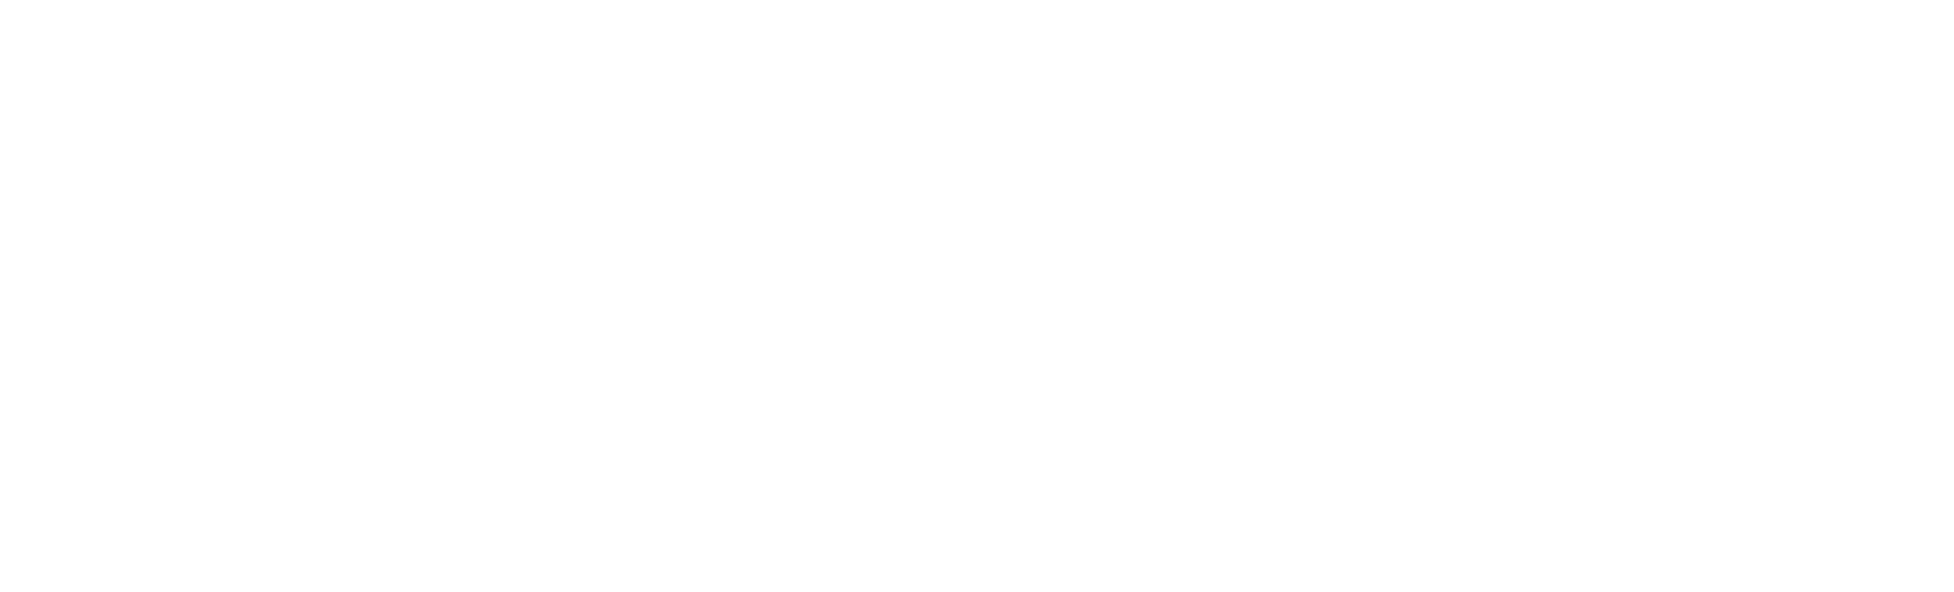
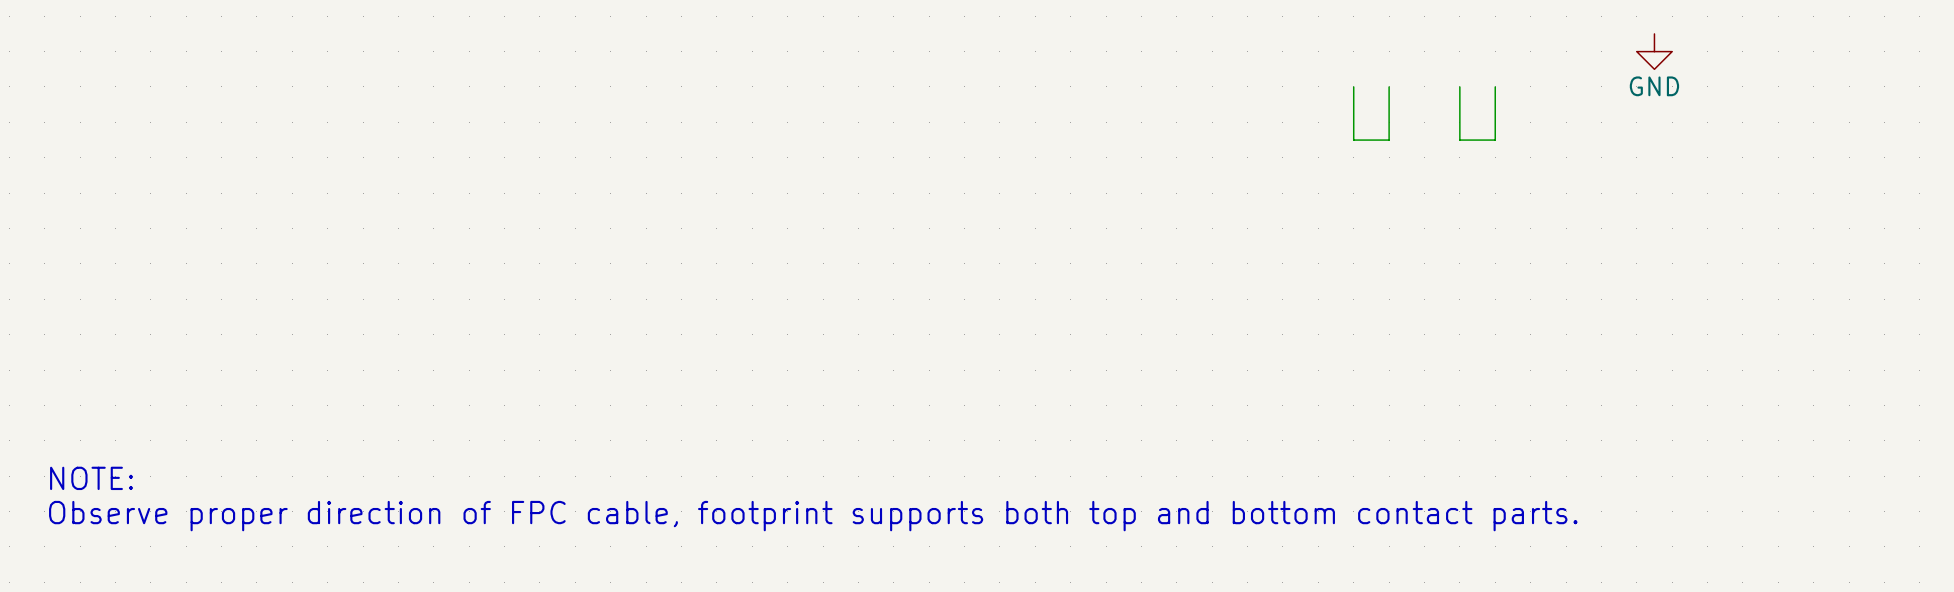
power symbol: none -> GND (1654, 51)
wire: none -> (1353, 86) (1353, 140) (1389, 140) (1389, 86)
wire: none -> (1459, 86) (1459, 140) (1495, 140) (1495, 86)
text: none -> NOTE: (91, 478)
text: none -> Observe proper direction of FPC cable, footprint supports both top and bottom contact parts. (813, 516)

